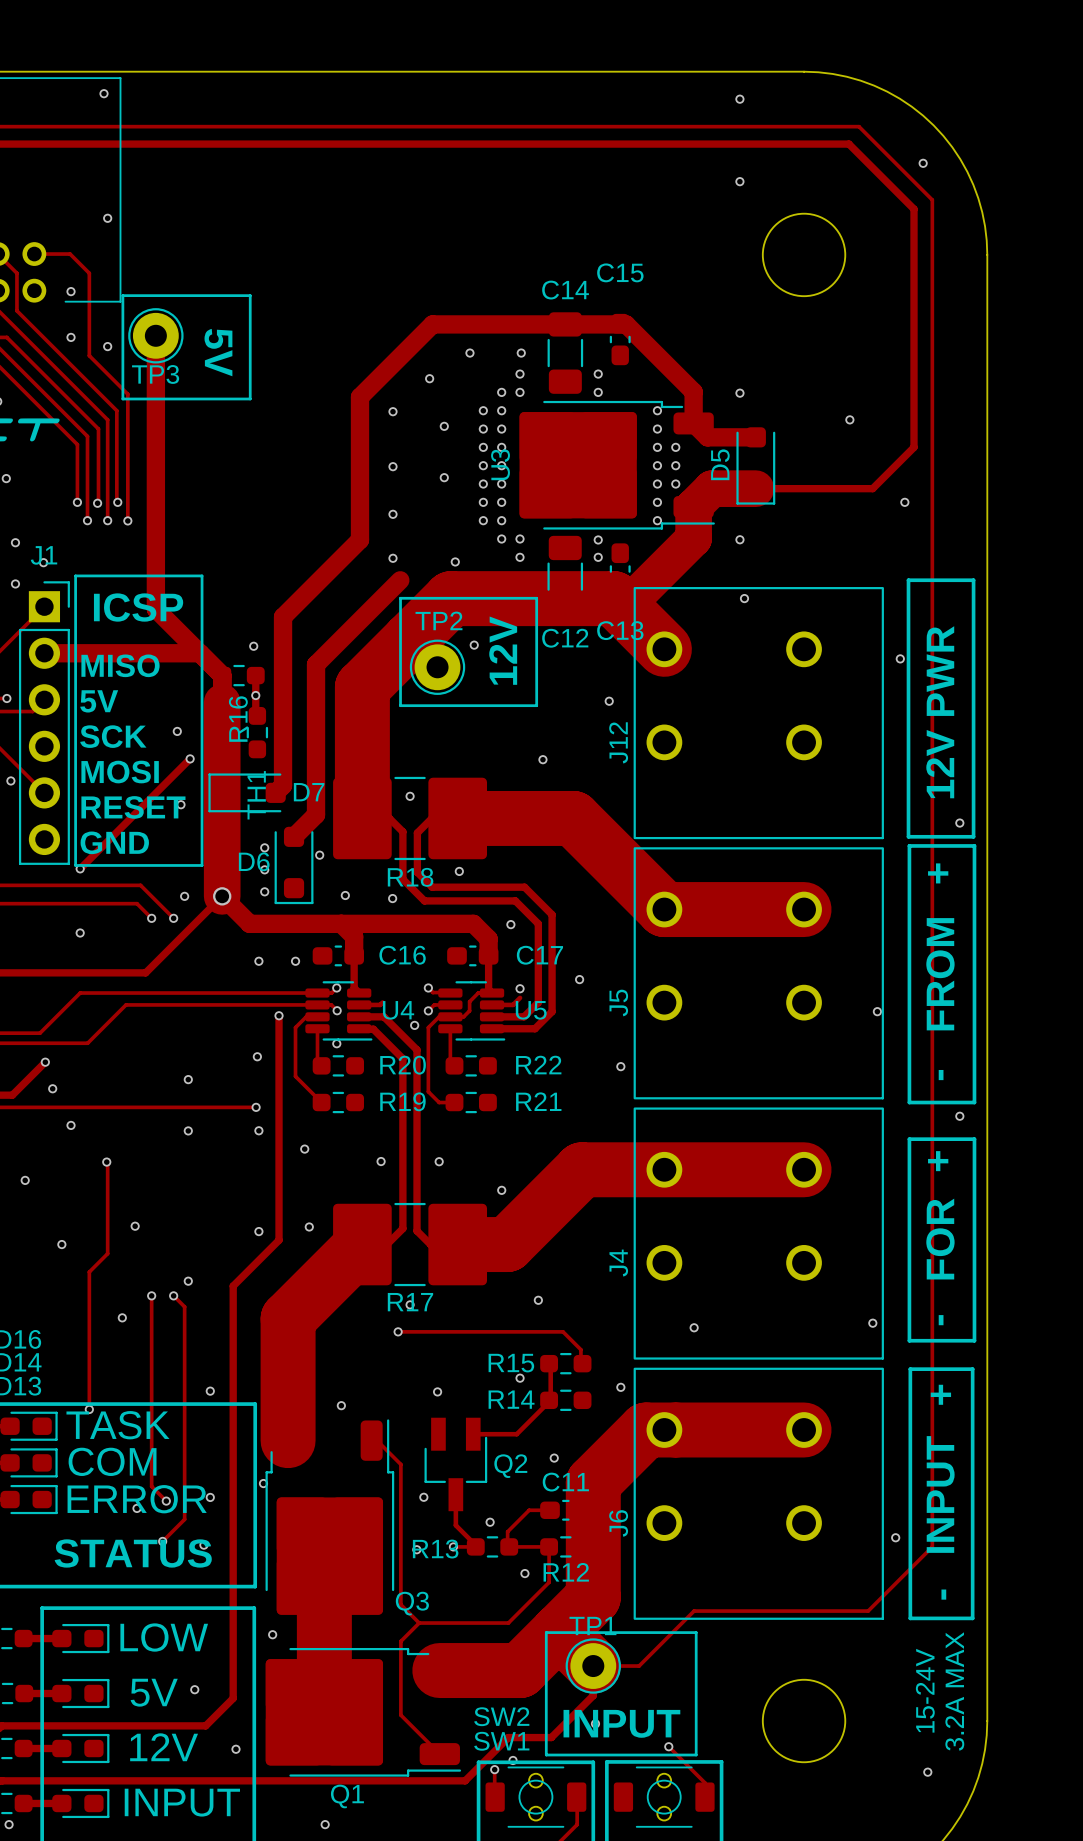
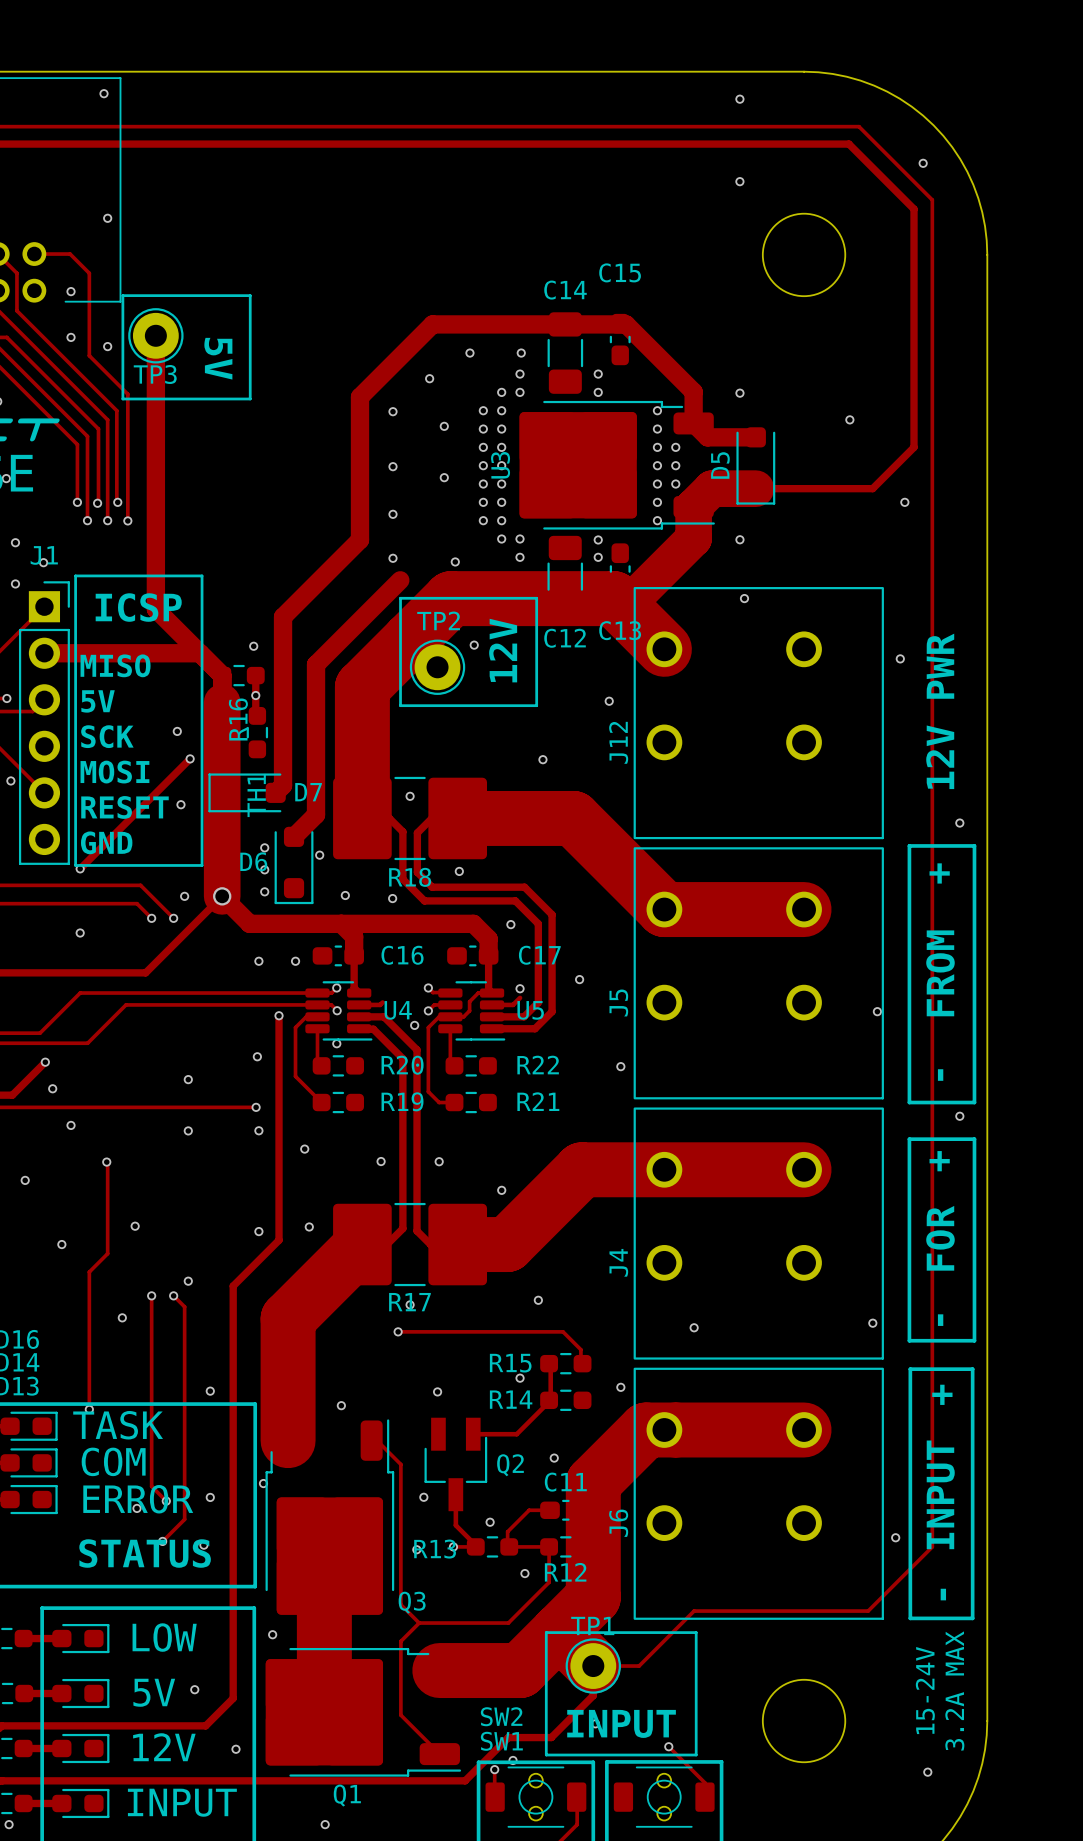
line: (908, 580) (973, 580) (973, 836) (908, 836) (908, 580) -> none

